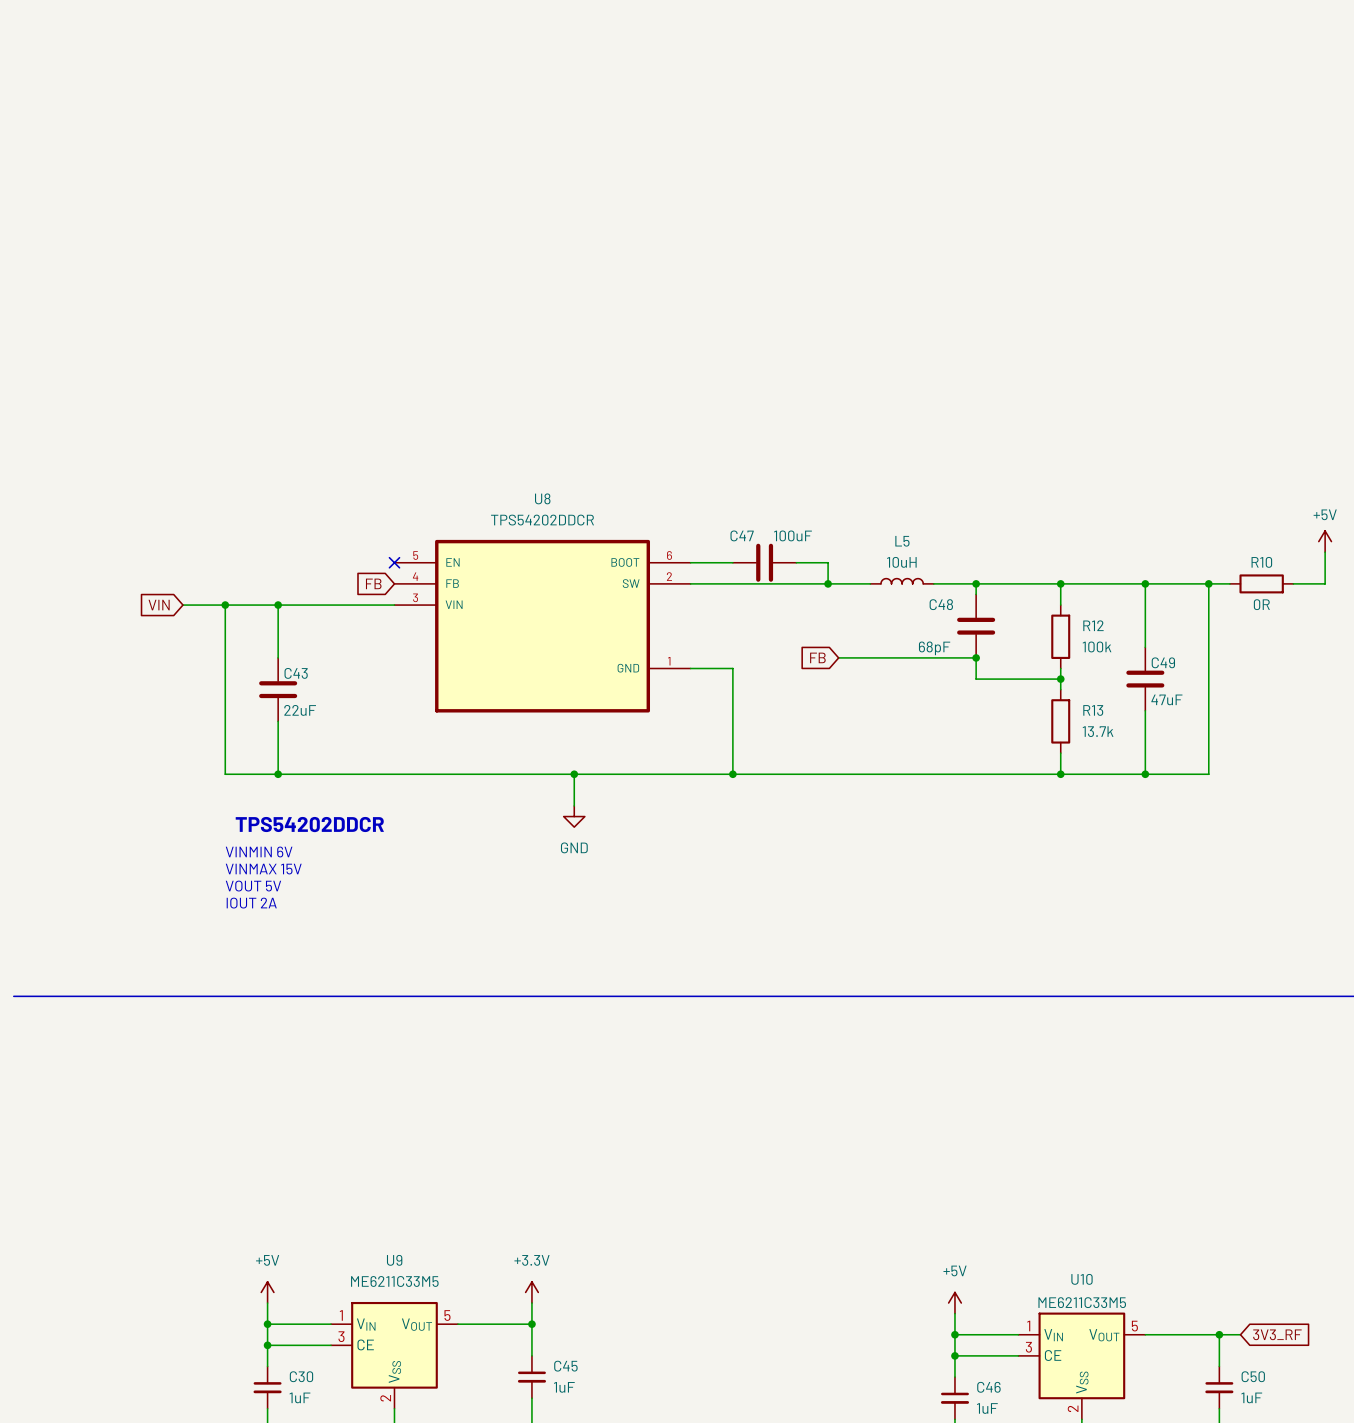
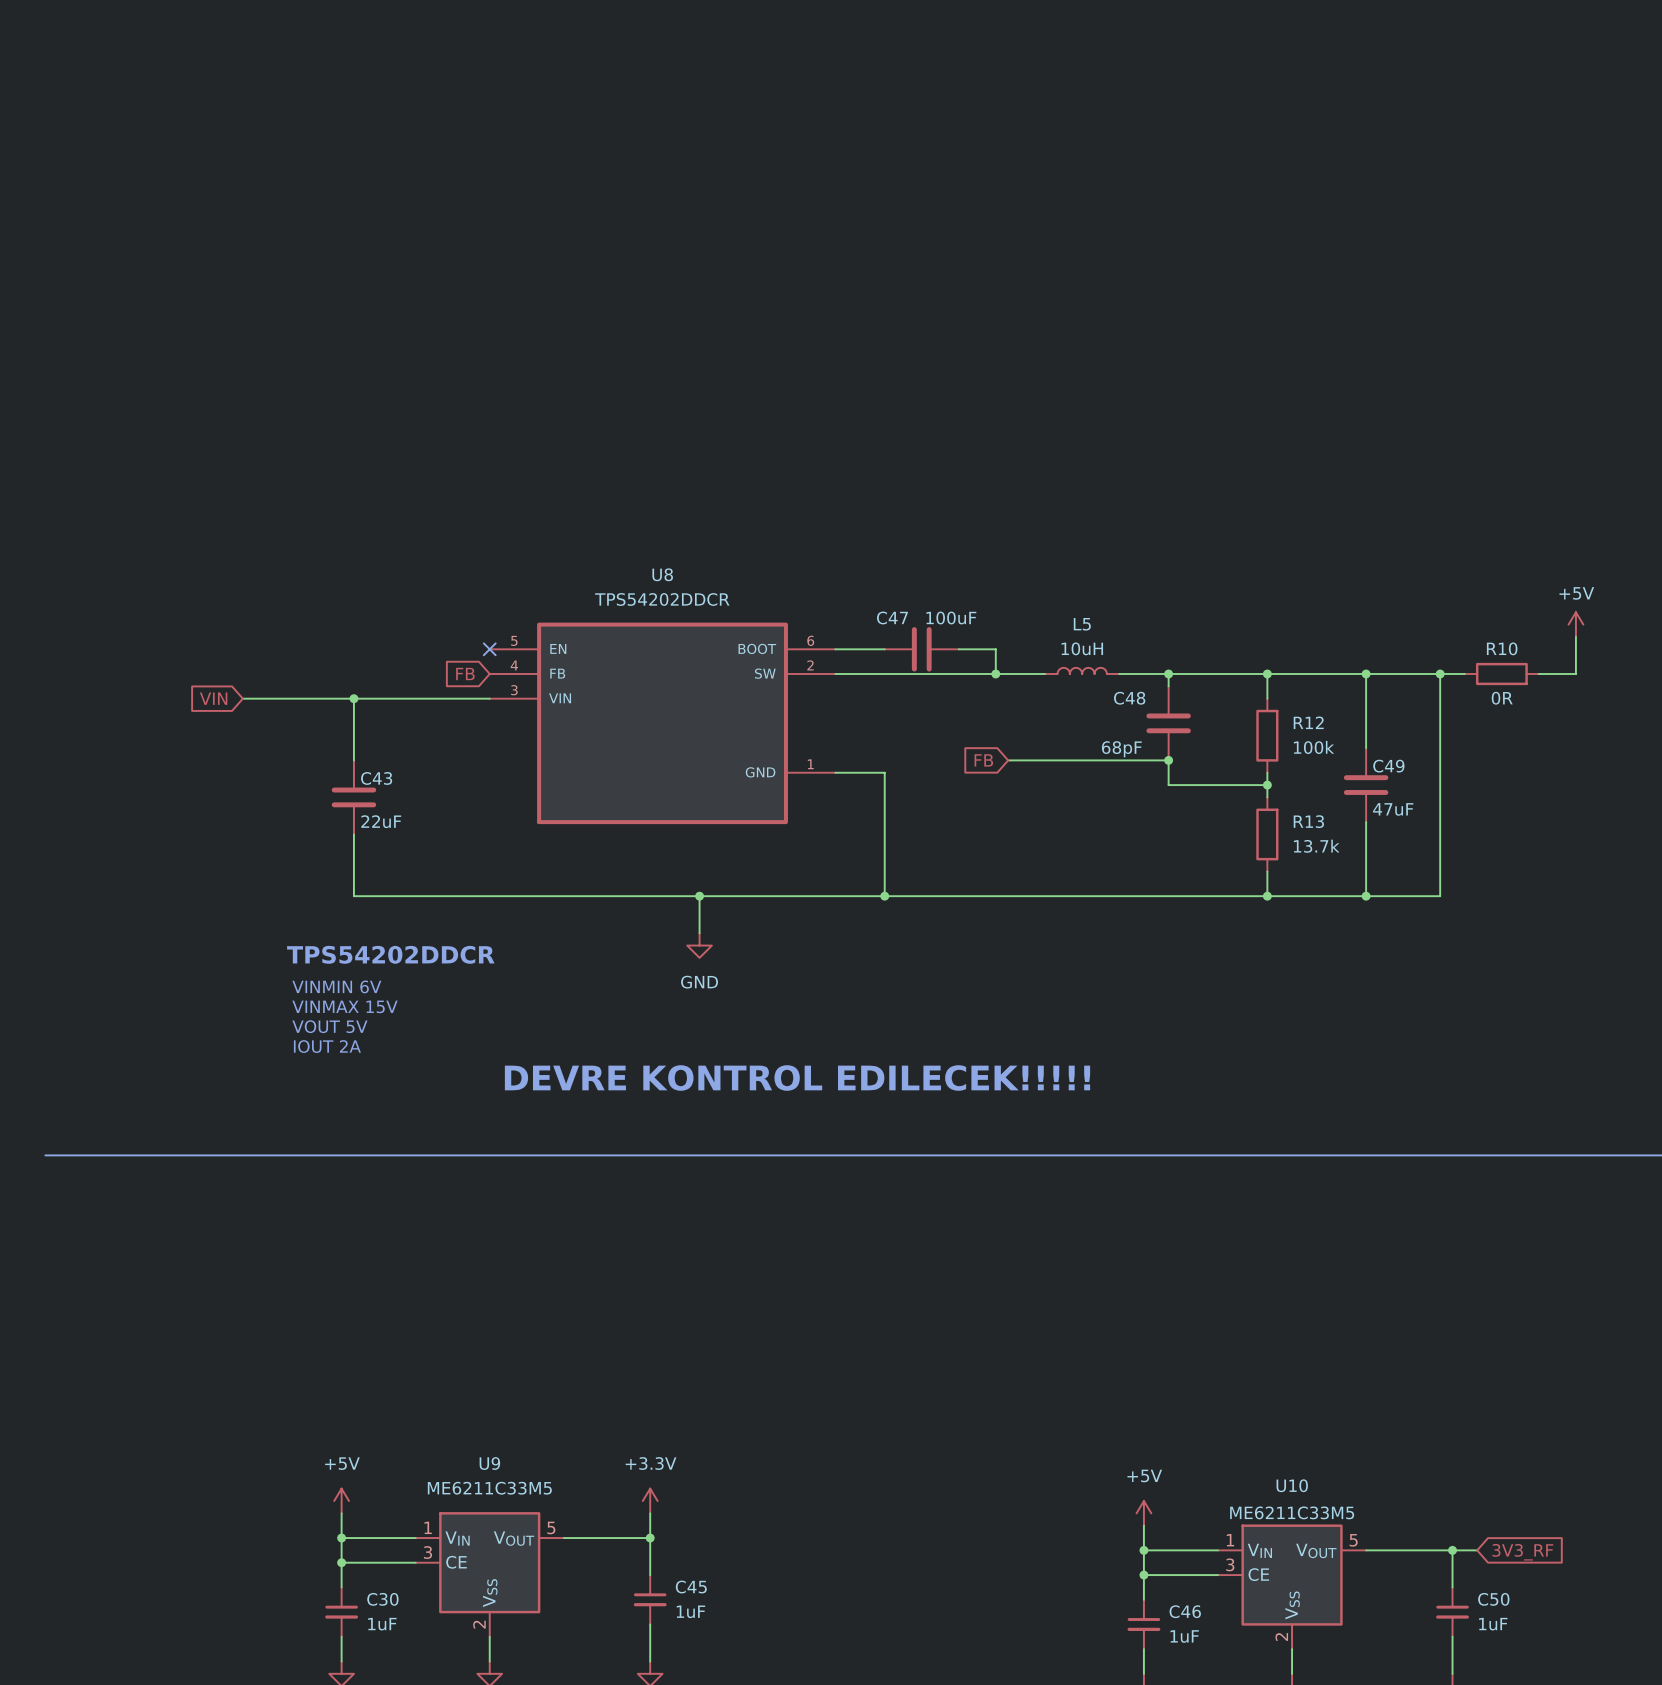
wire: (225, 605) (225, 774) (278, 774) -> none
junction: (225, 605) -> none
junction: (278, 774) -> none
text: none -> DEVRE KONTROL EDILECEK!!!!! (797, 1077)

